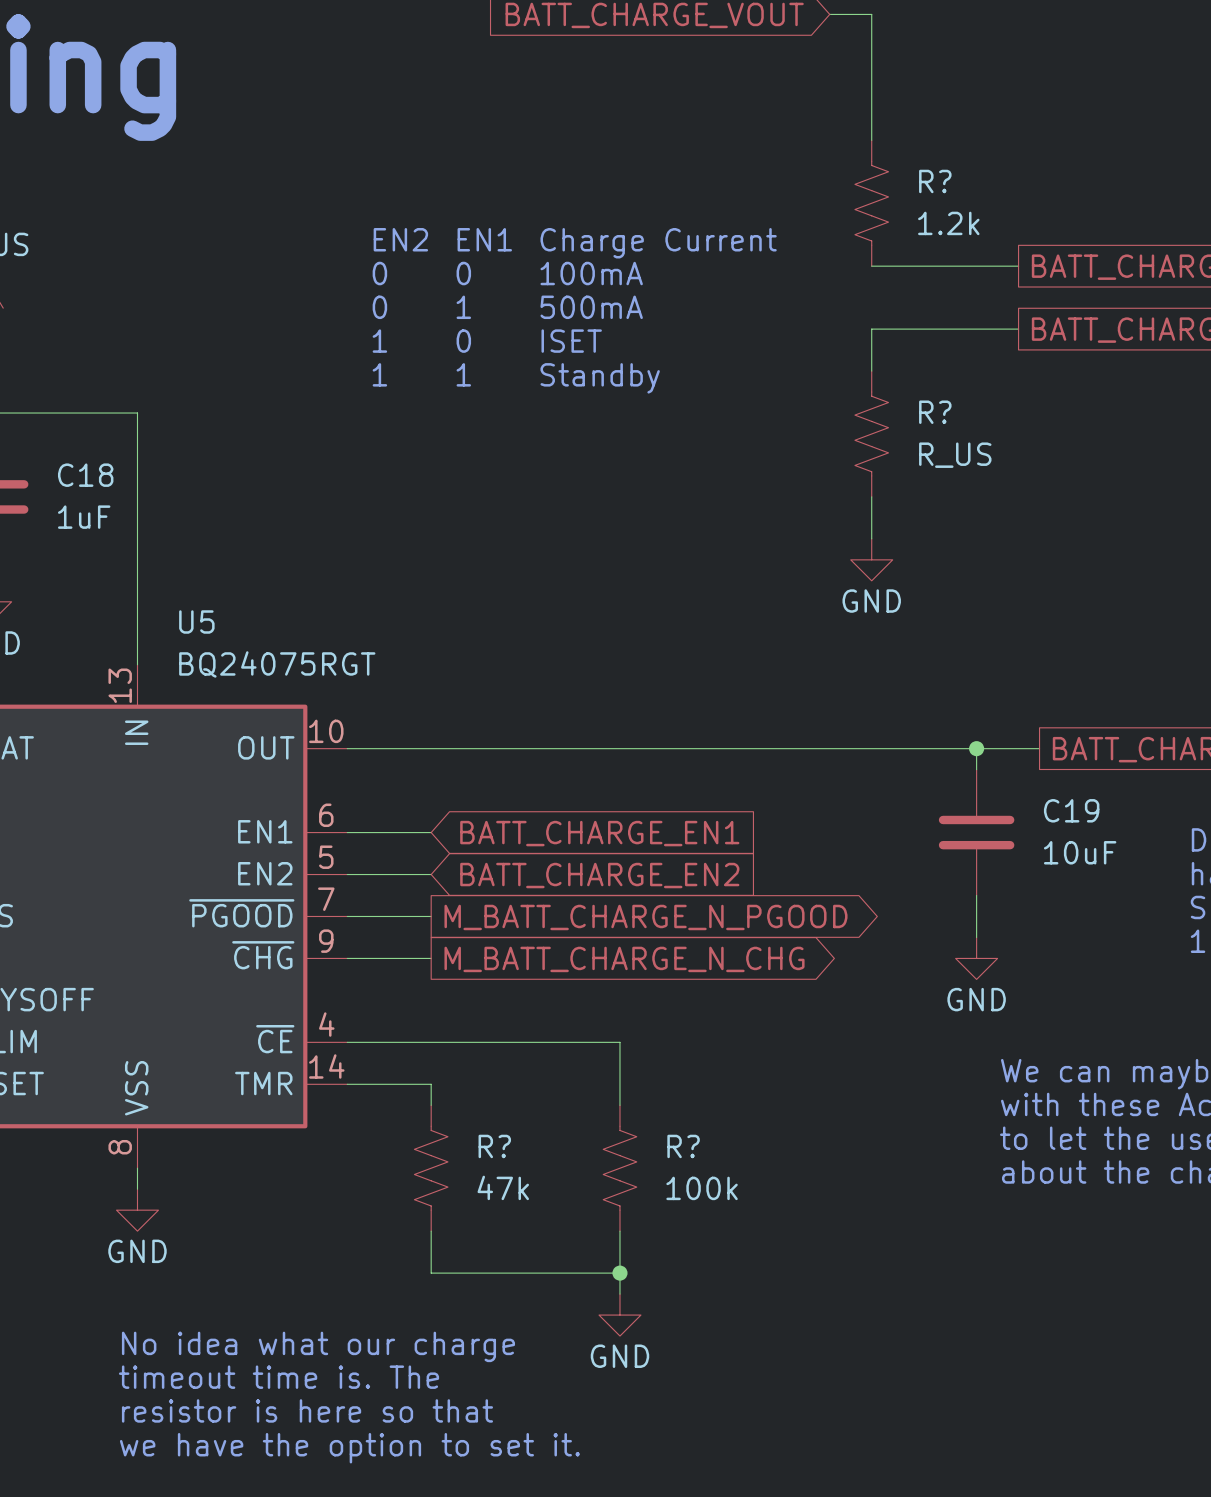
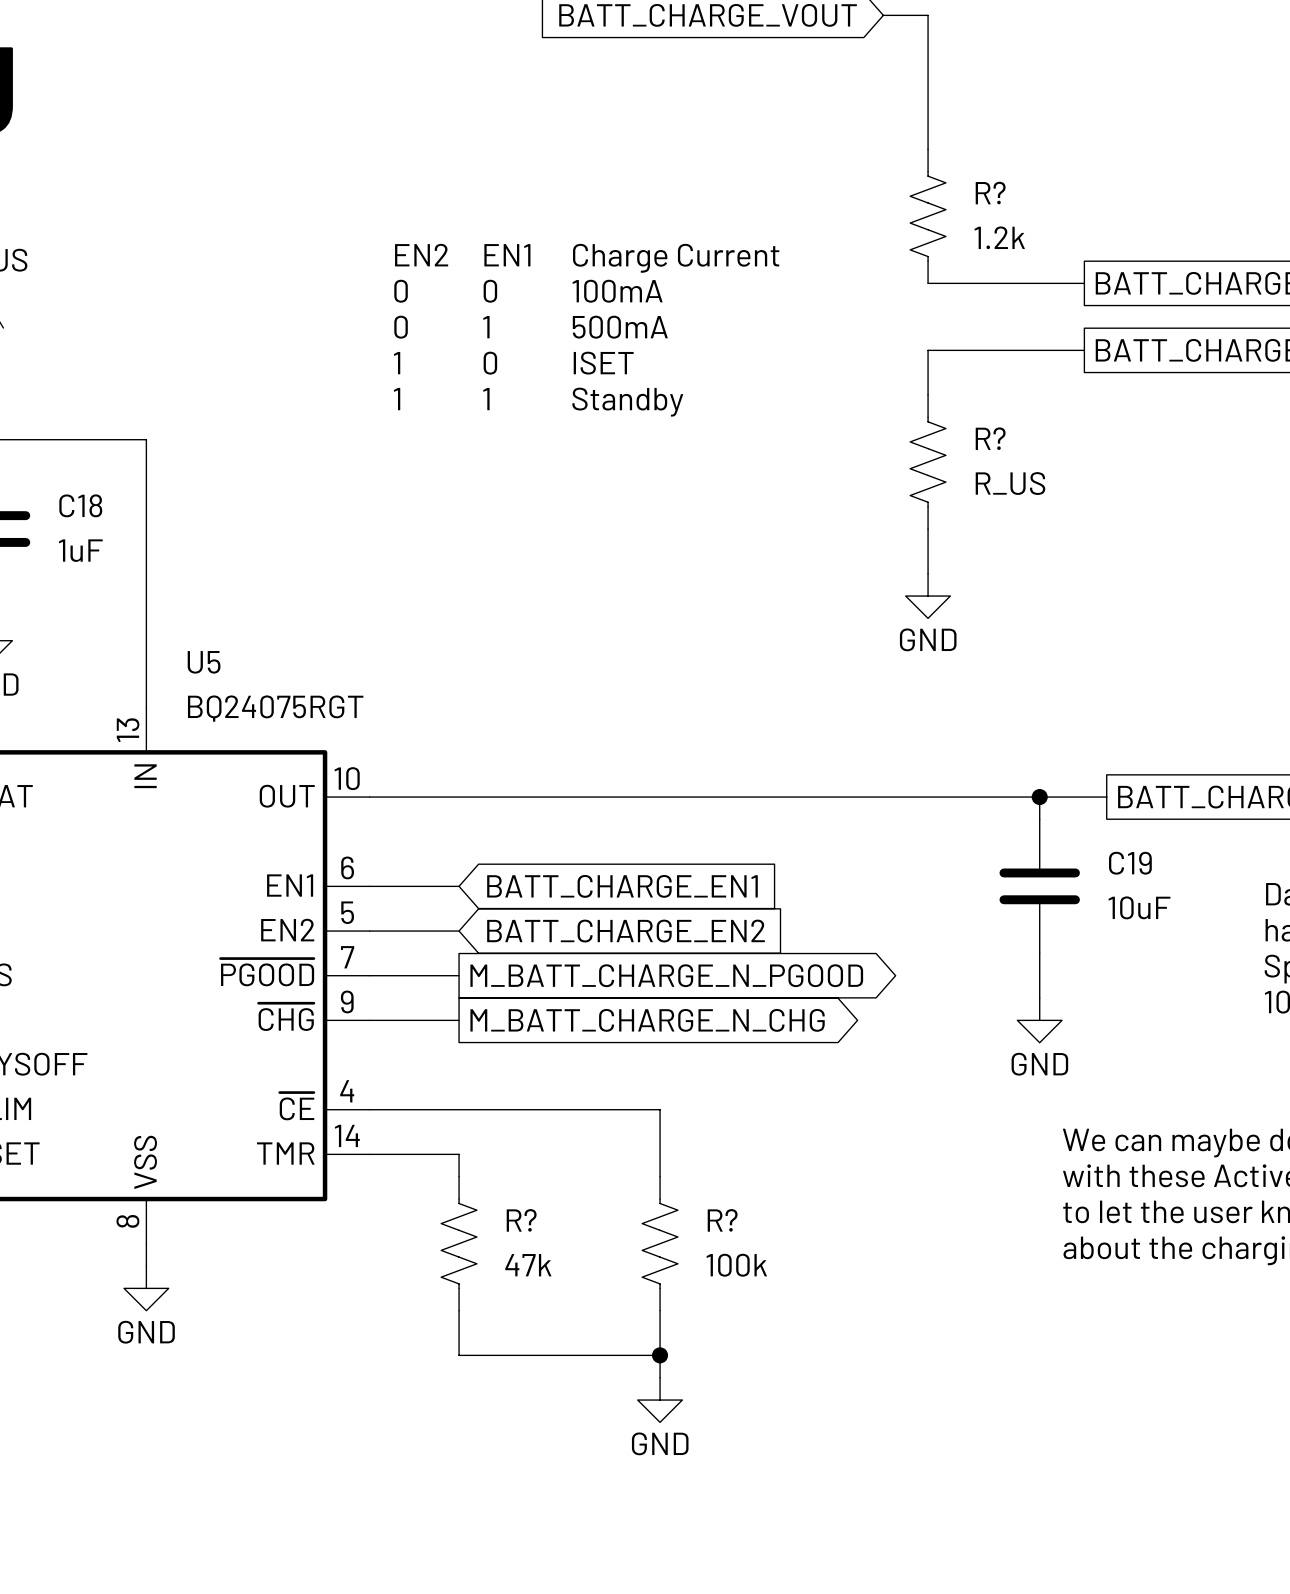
text: No idea what our charge (318, 1346) -> none
text: timeout time is. The (279, 1377) -> none
text: resistor is here so that (307, 1410) -> none
text: we have the option to set it. (349, 1448) -> none

